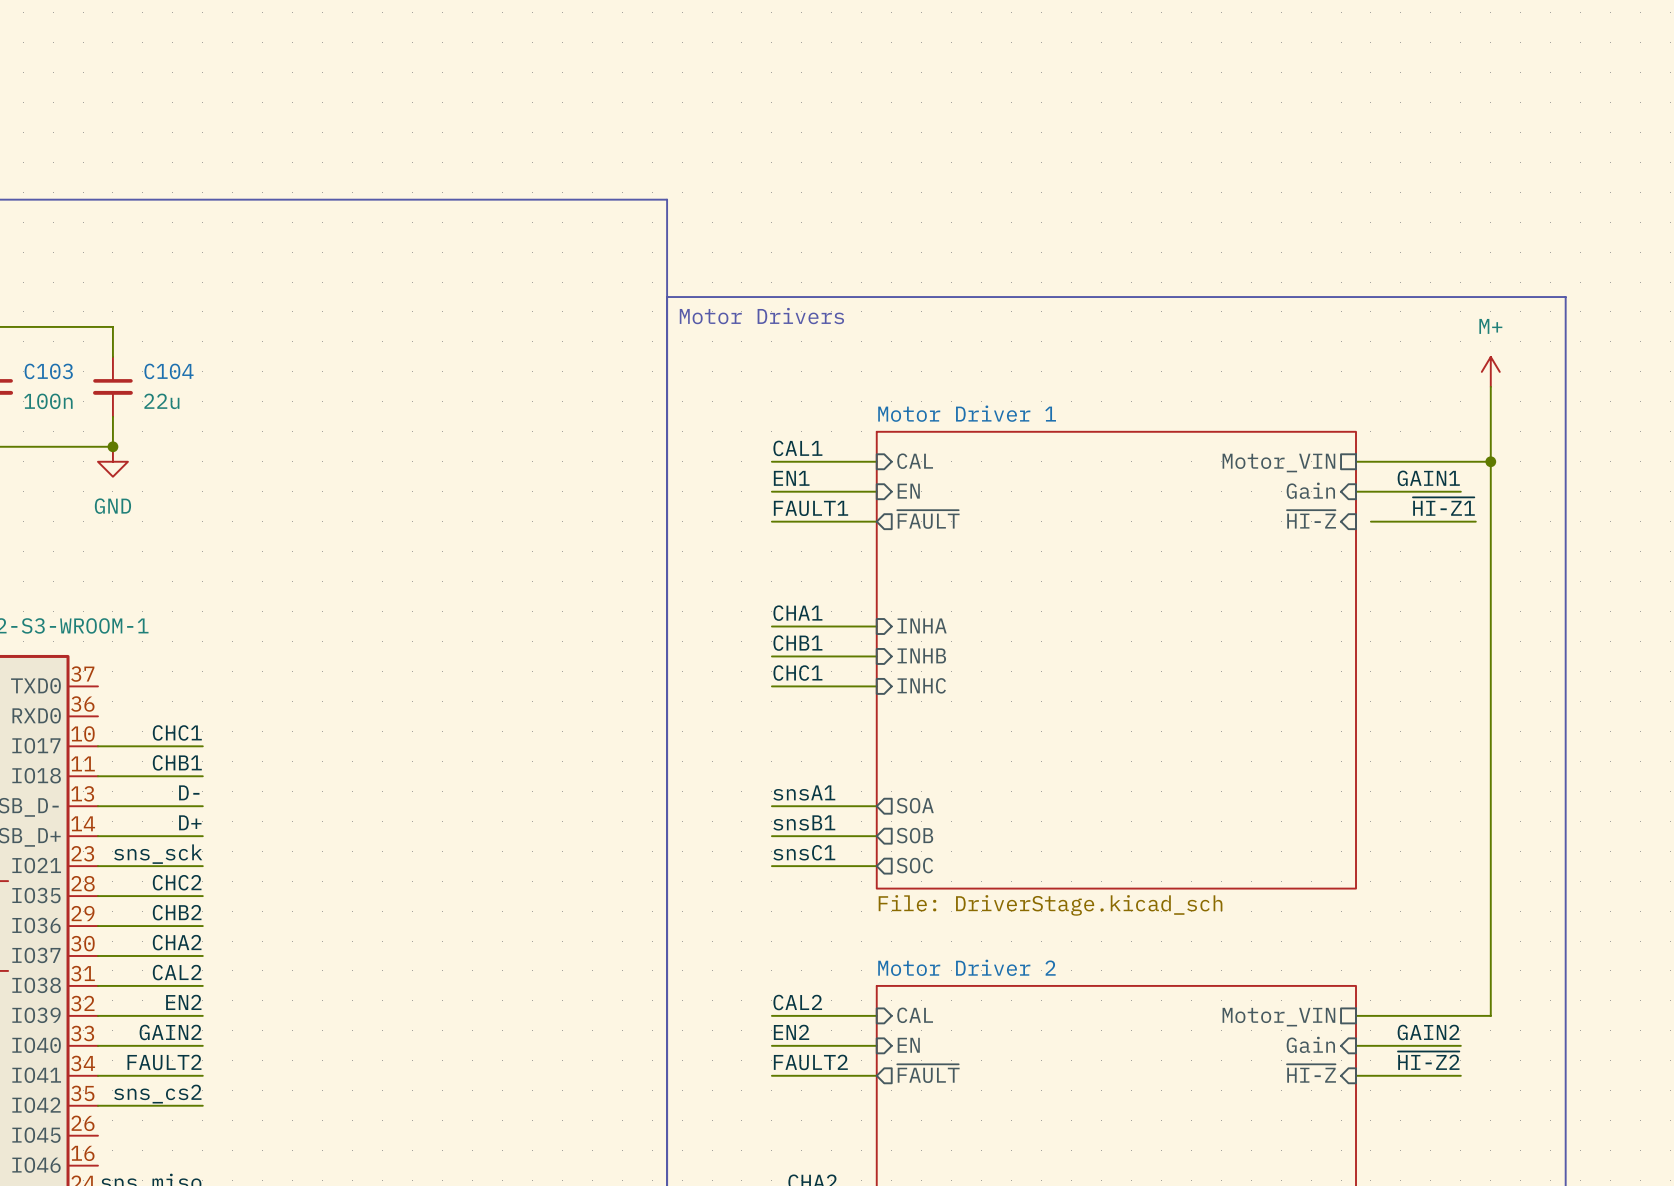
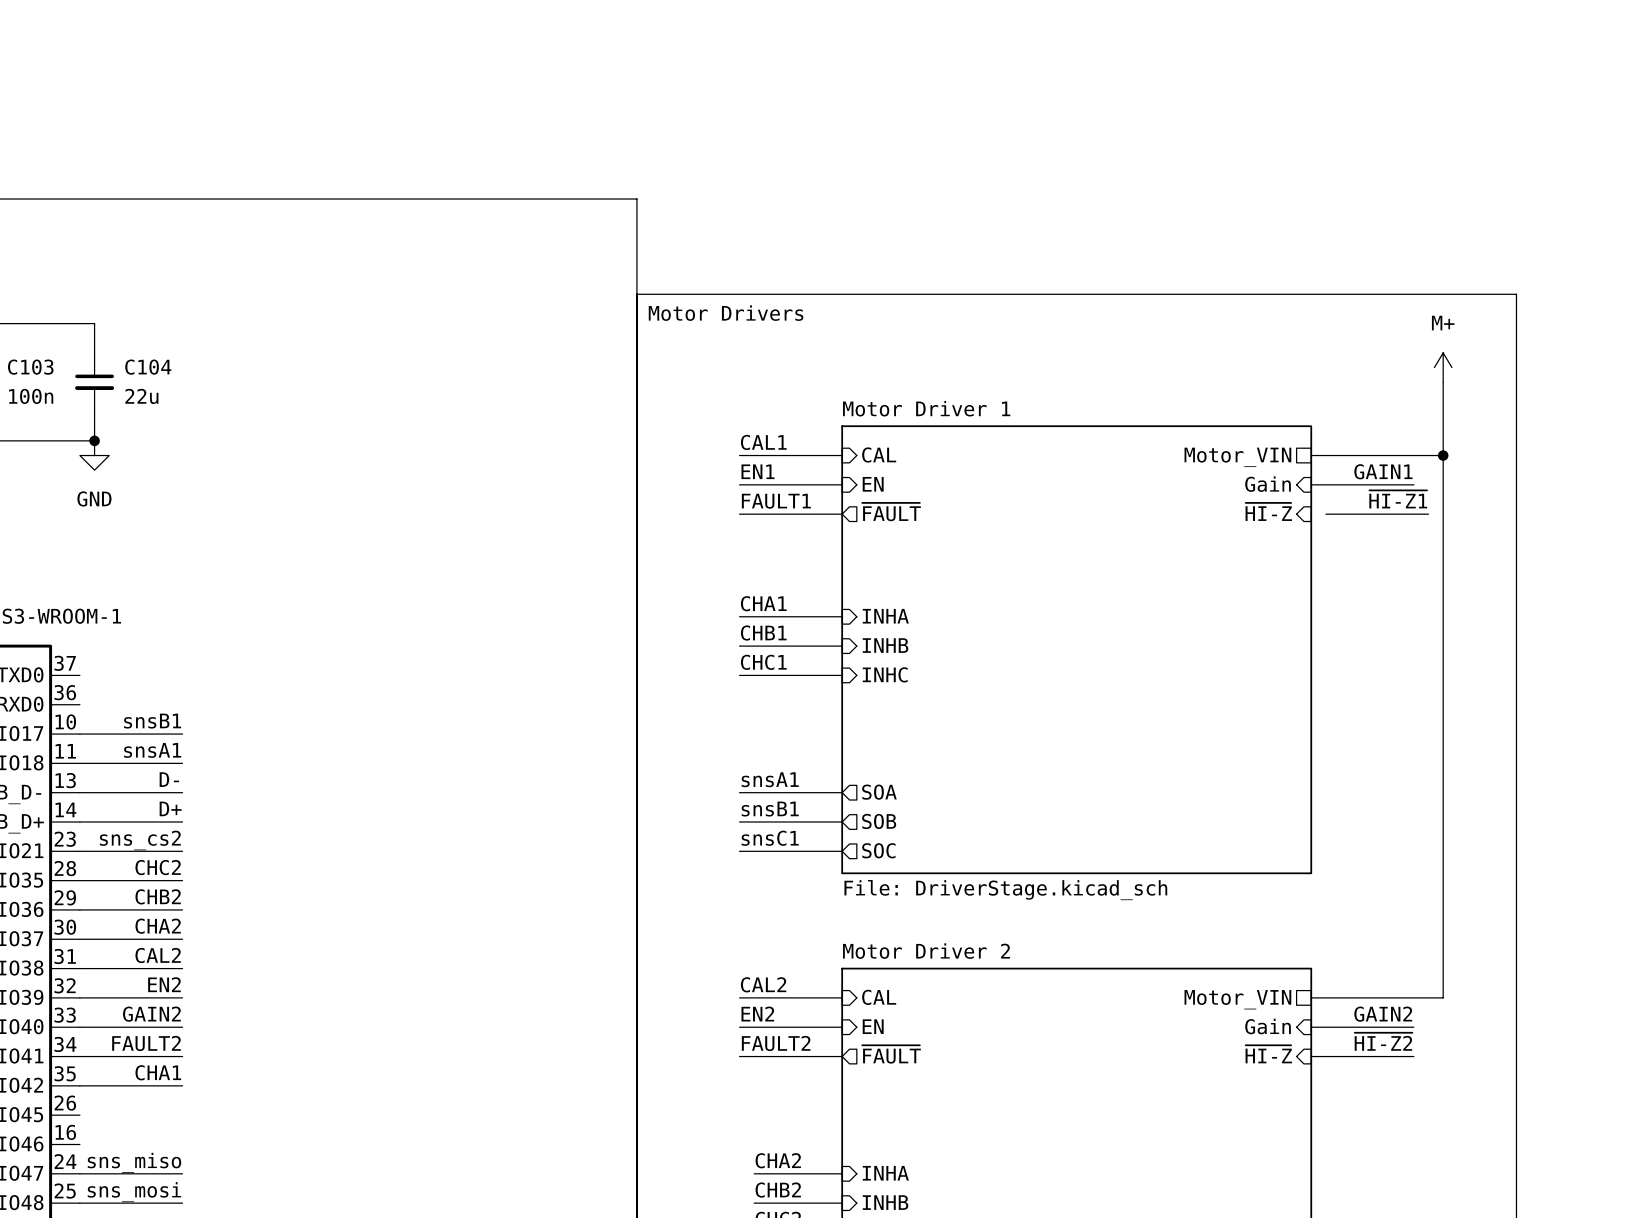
label: CHC1 (177, 732) -> snsB1 (152, 721)
label: CHB1 (177, 762) -> snsA1 (152, 750)
label: sns_sck (158, 854) -> sns_cs2 (140, 840)
label: sns_cs2 (157, 1094) -> CHA1 (158, 1072)

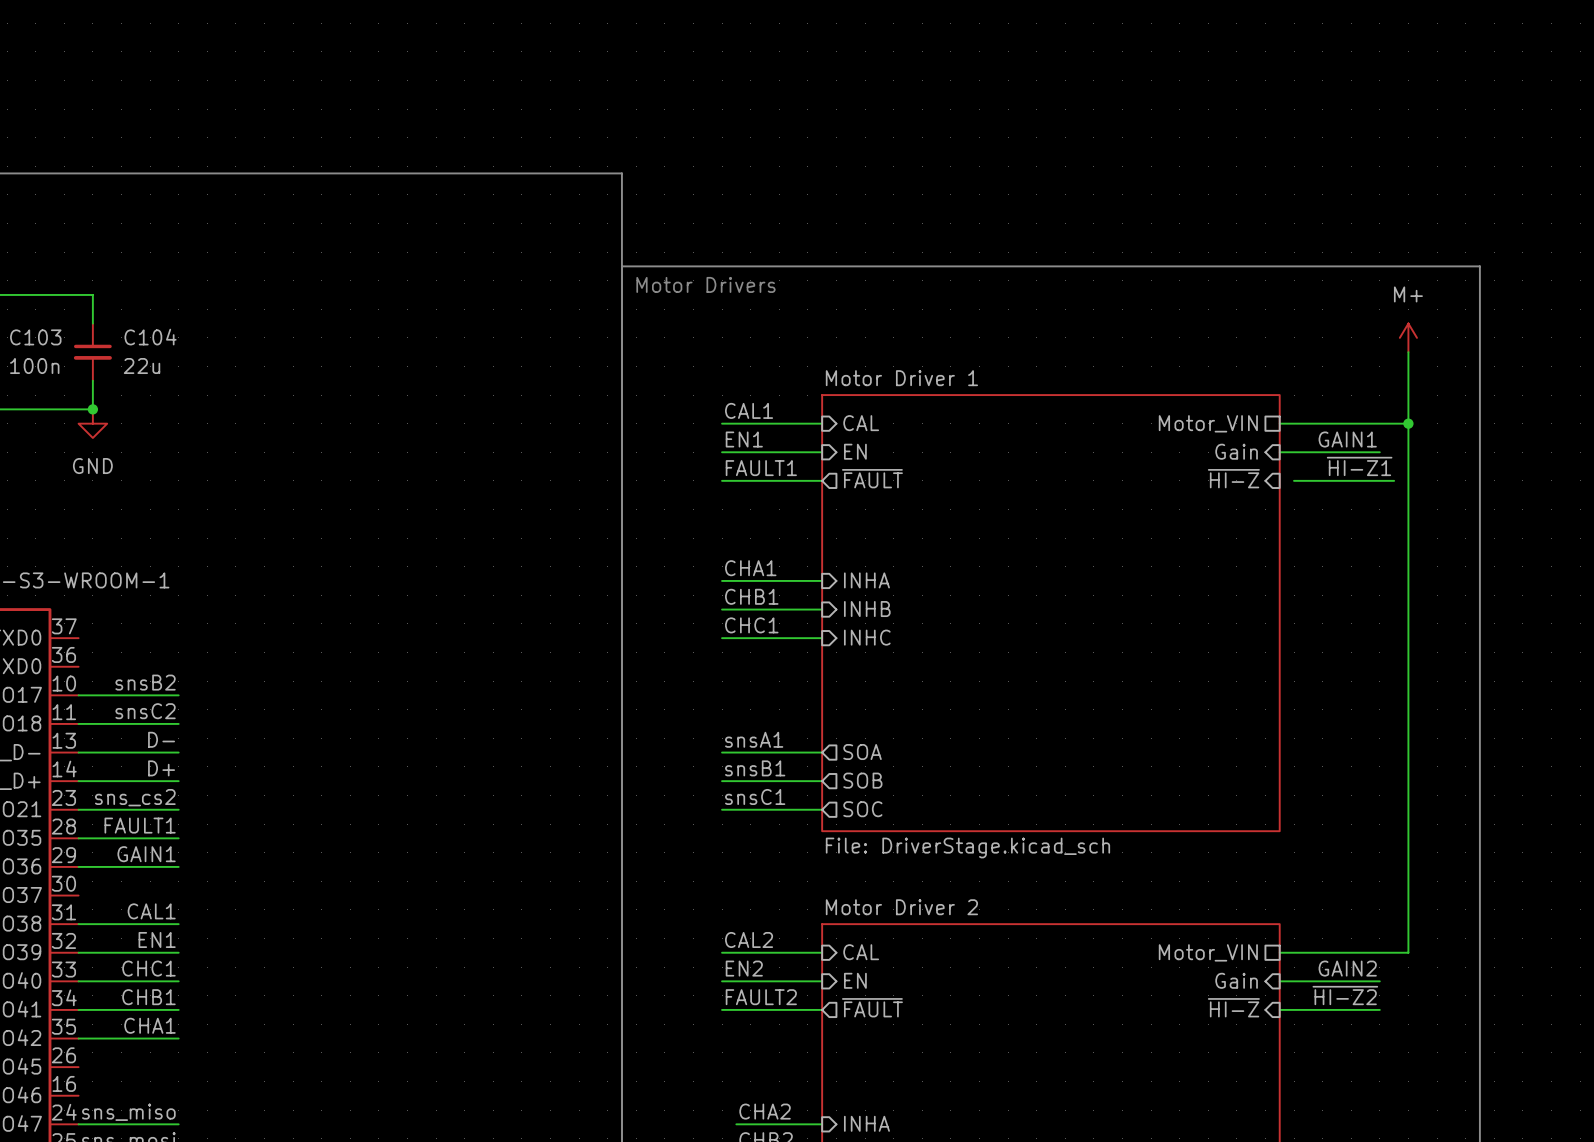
label: snsB1 (152, 721) -> snsB2 (145, 682)
label: snsA1 (152, 750) -> snsC2 (145, 711)
label: CHC2 (158, 867) -> FAULT1 (140, 825)
label: CHB2 (158, 896) -> GAIN1 (146, 854)
label: CHA2 (158, 926) -> none
wire: (79, 939) (182, 939) -> none
label: CAL2 (158, 955) -> CAL1 (151, 911)
label: EN2 (164, 984) -> EN1 (157, 939)
label: GAIN2 (151, 1014) -> CHC1 (148, 968)
label: FAULT2 (146, 1043) -> CHB1 (148, 997)

